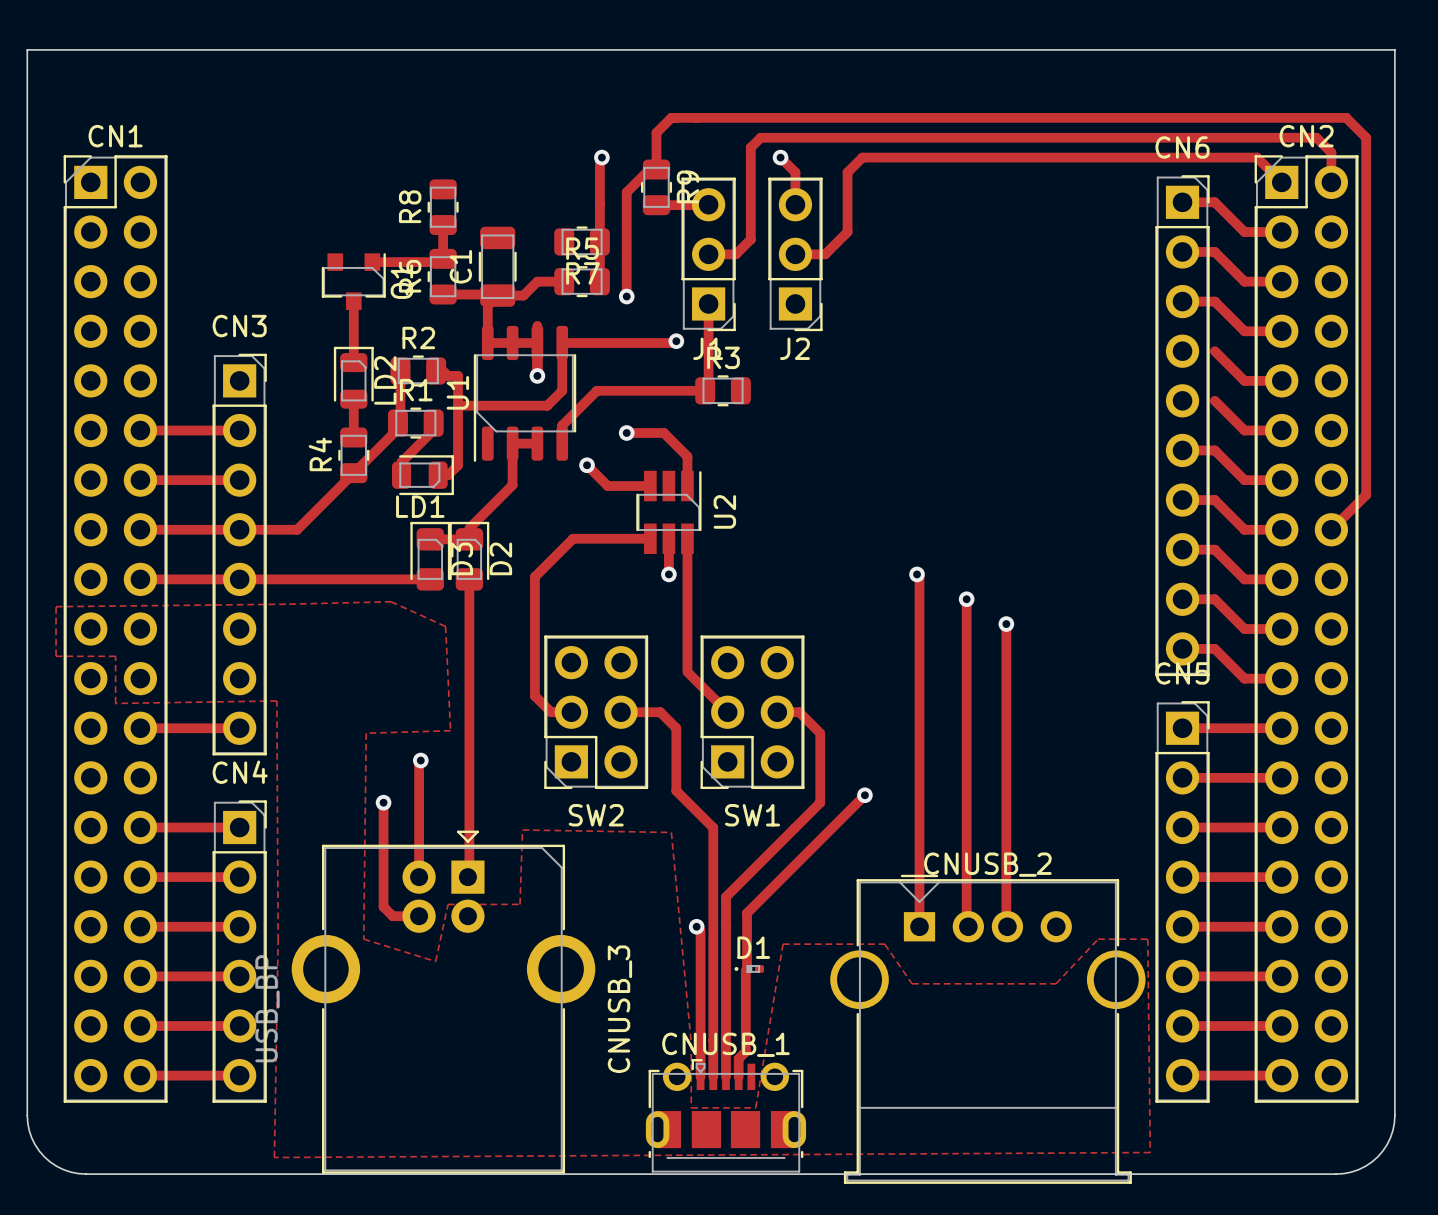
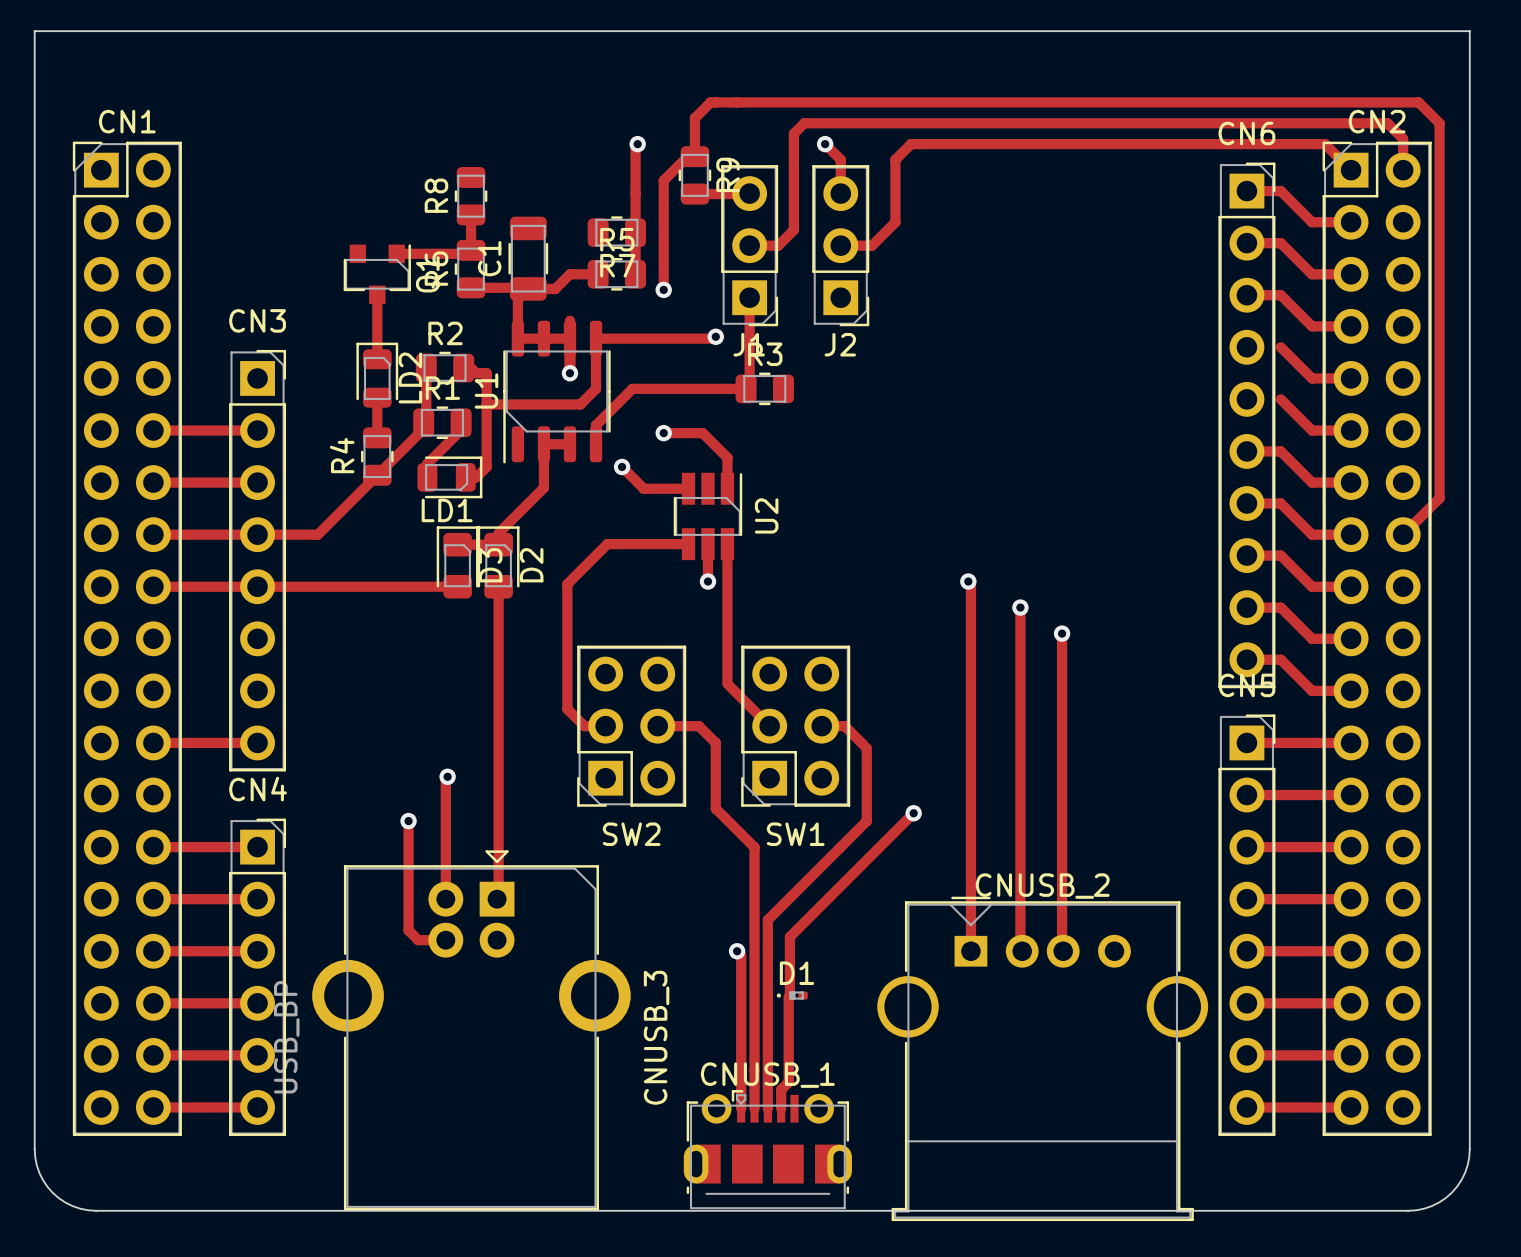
zone outline: (391, 601) (445, 626) (450, 730) (366, 733) (363, 939) (435, 961) (448, 904) (520, 904) (522, 829) (671, 832) (691, 1043) (691, 1107) (755, 1107) (783, 944) (884, 944) (912, 983) (1055, 983) (1098, 939) (1147, 939) (1150, 1152) (274, 1157) (278, 940) (276, 700) (115, 703) (115, 656) (56, 656) (56, 606) (391, 601) -> none

